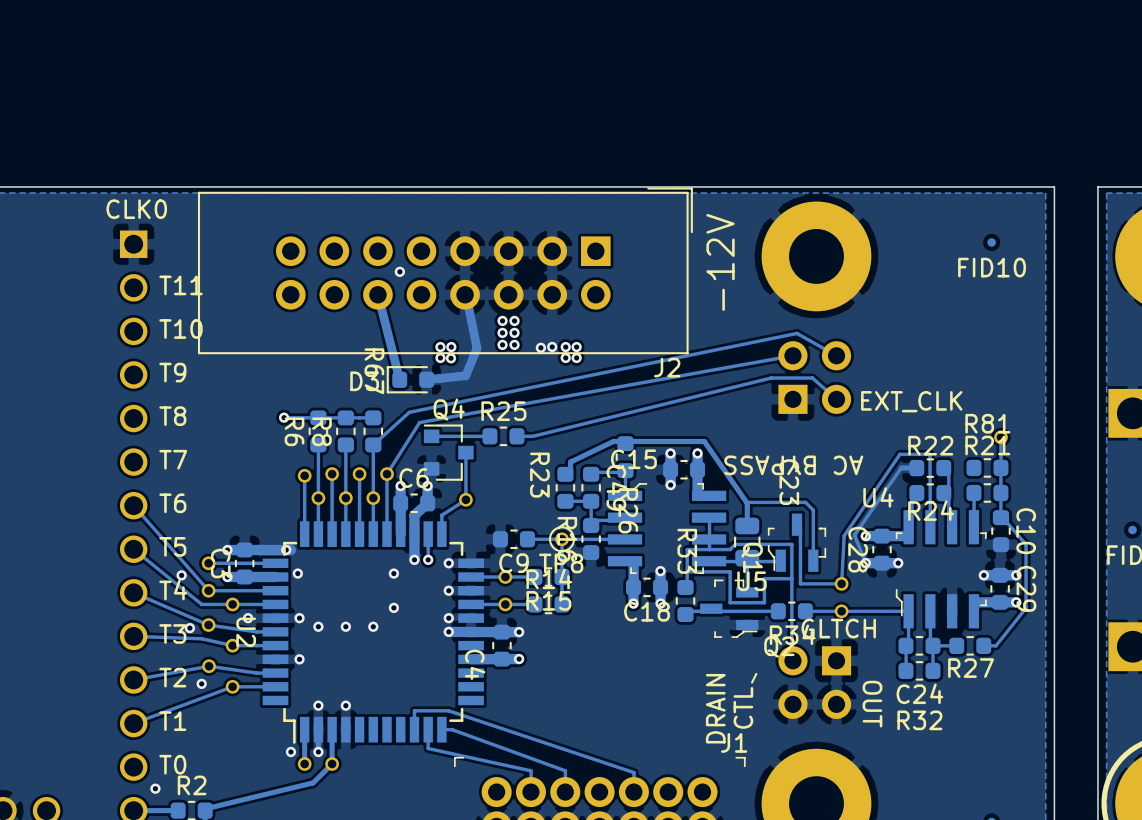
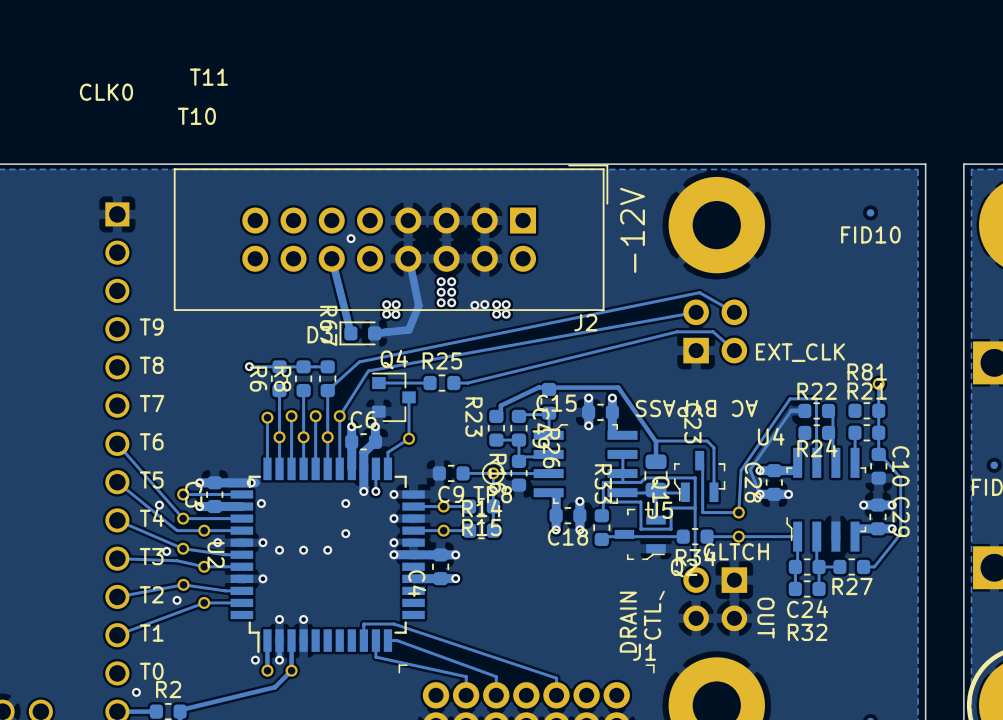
text position: CLK0 (136, 209) -> CLK0 (106, 92)
text position: T11 (180, 285) -> T11 (208, 77)
text position: T10 (180, 328) -> T10 (196, 116)

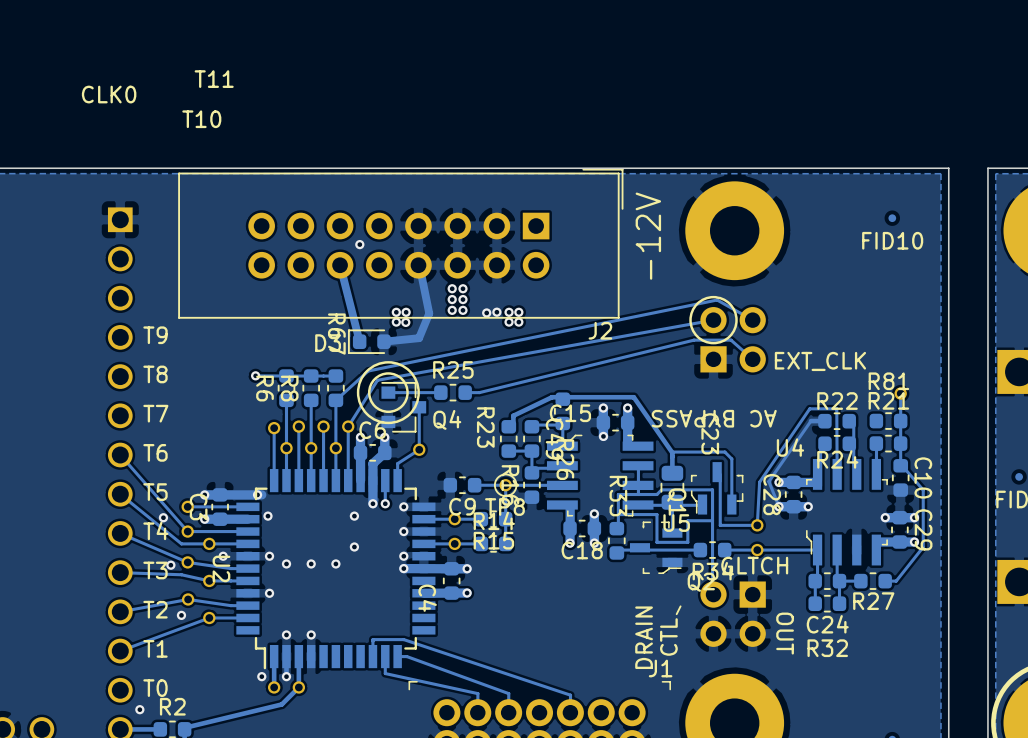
drawing: none -> [689, 295, 738, 345]
drawing: none -> [356, 361, 420, 425]
Q4 name position: Q4 (394, 359) -> Q4 (447, 419)

